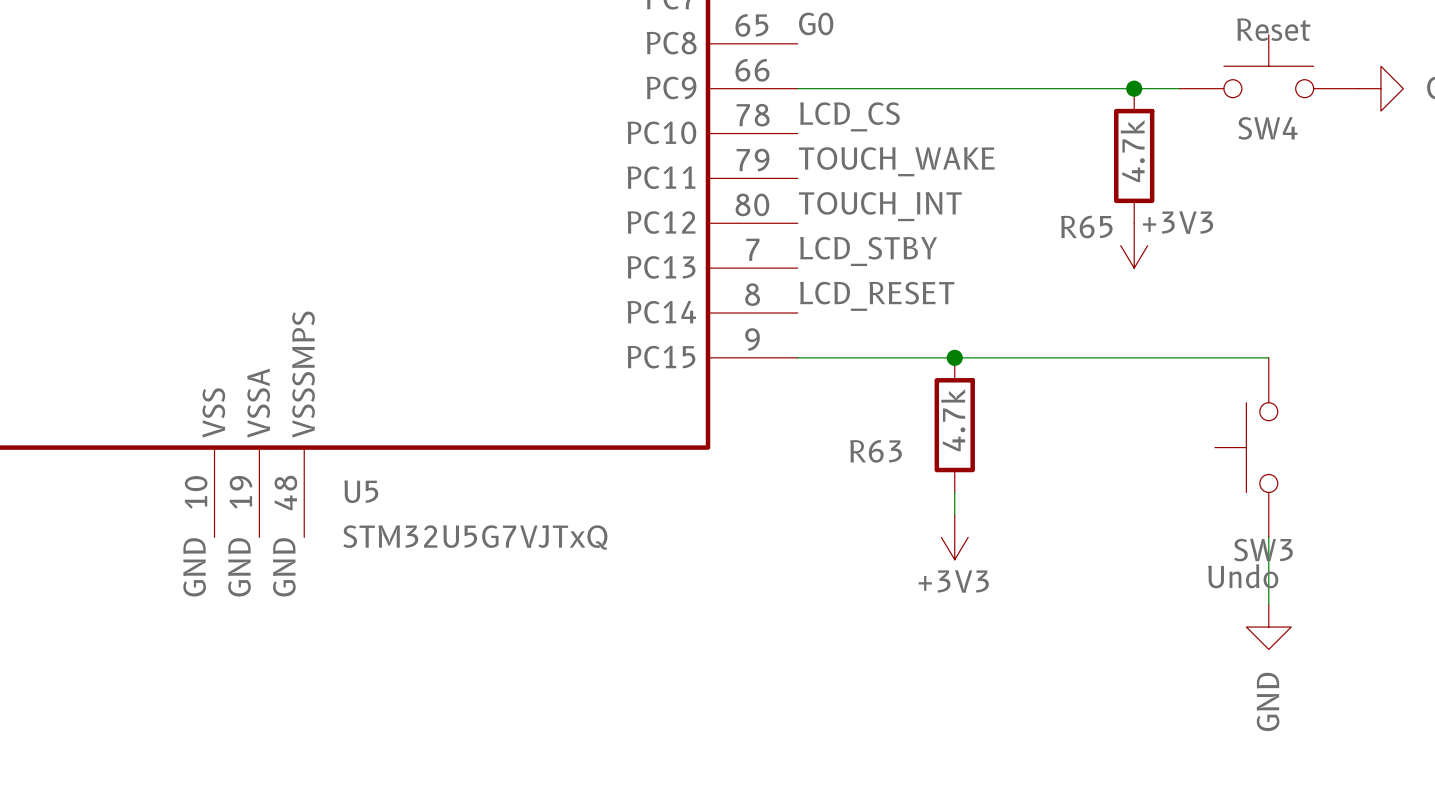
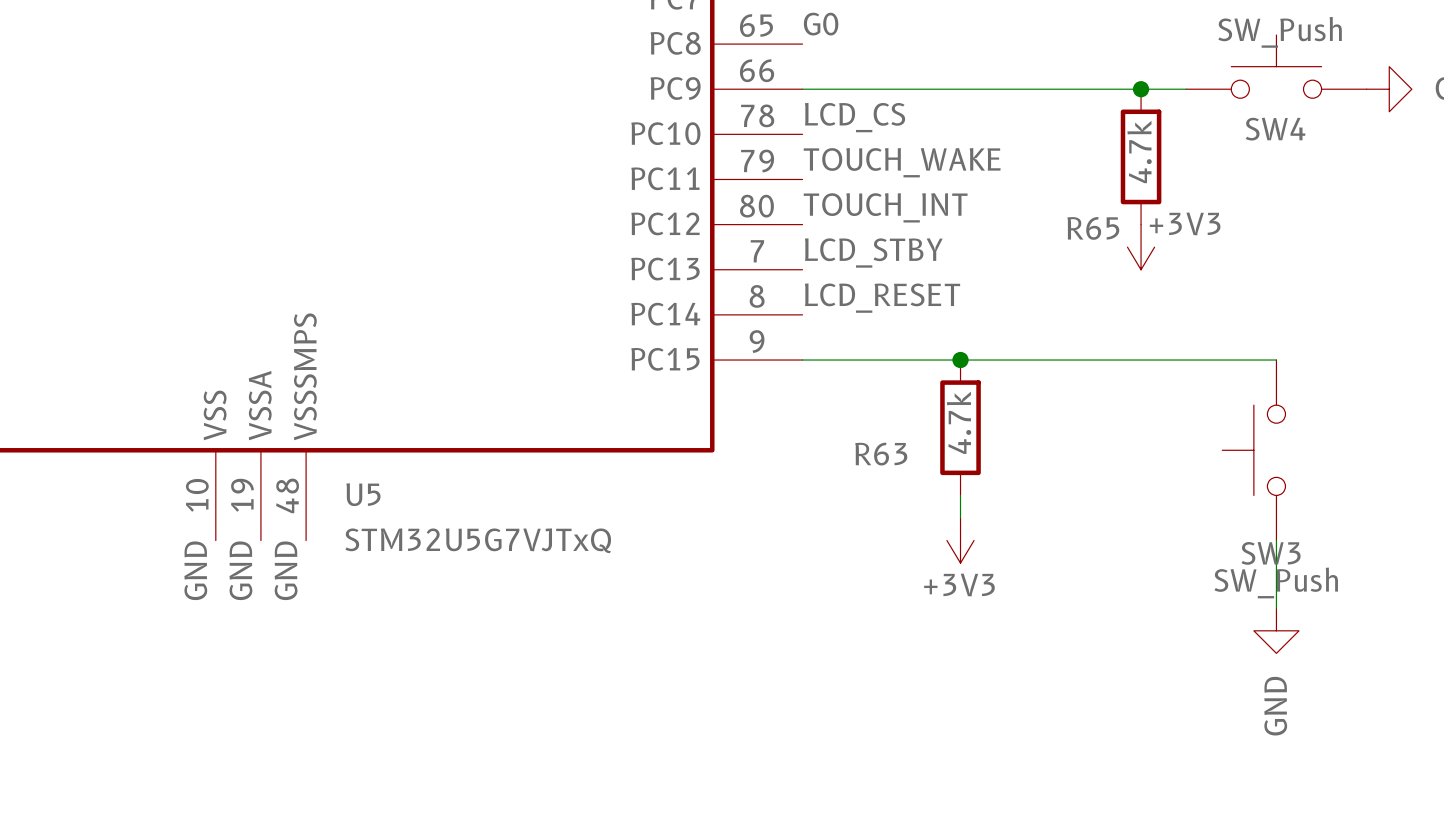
SW4 value: Reset (1273, 29) -> SW_Push (1280, 32)
SW3 value: Undo (1243, 576) -> SW_Push (1276, 582)

